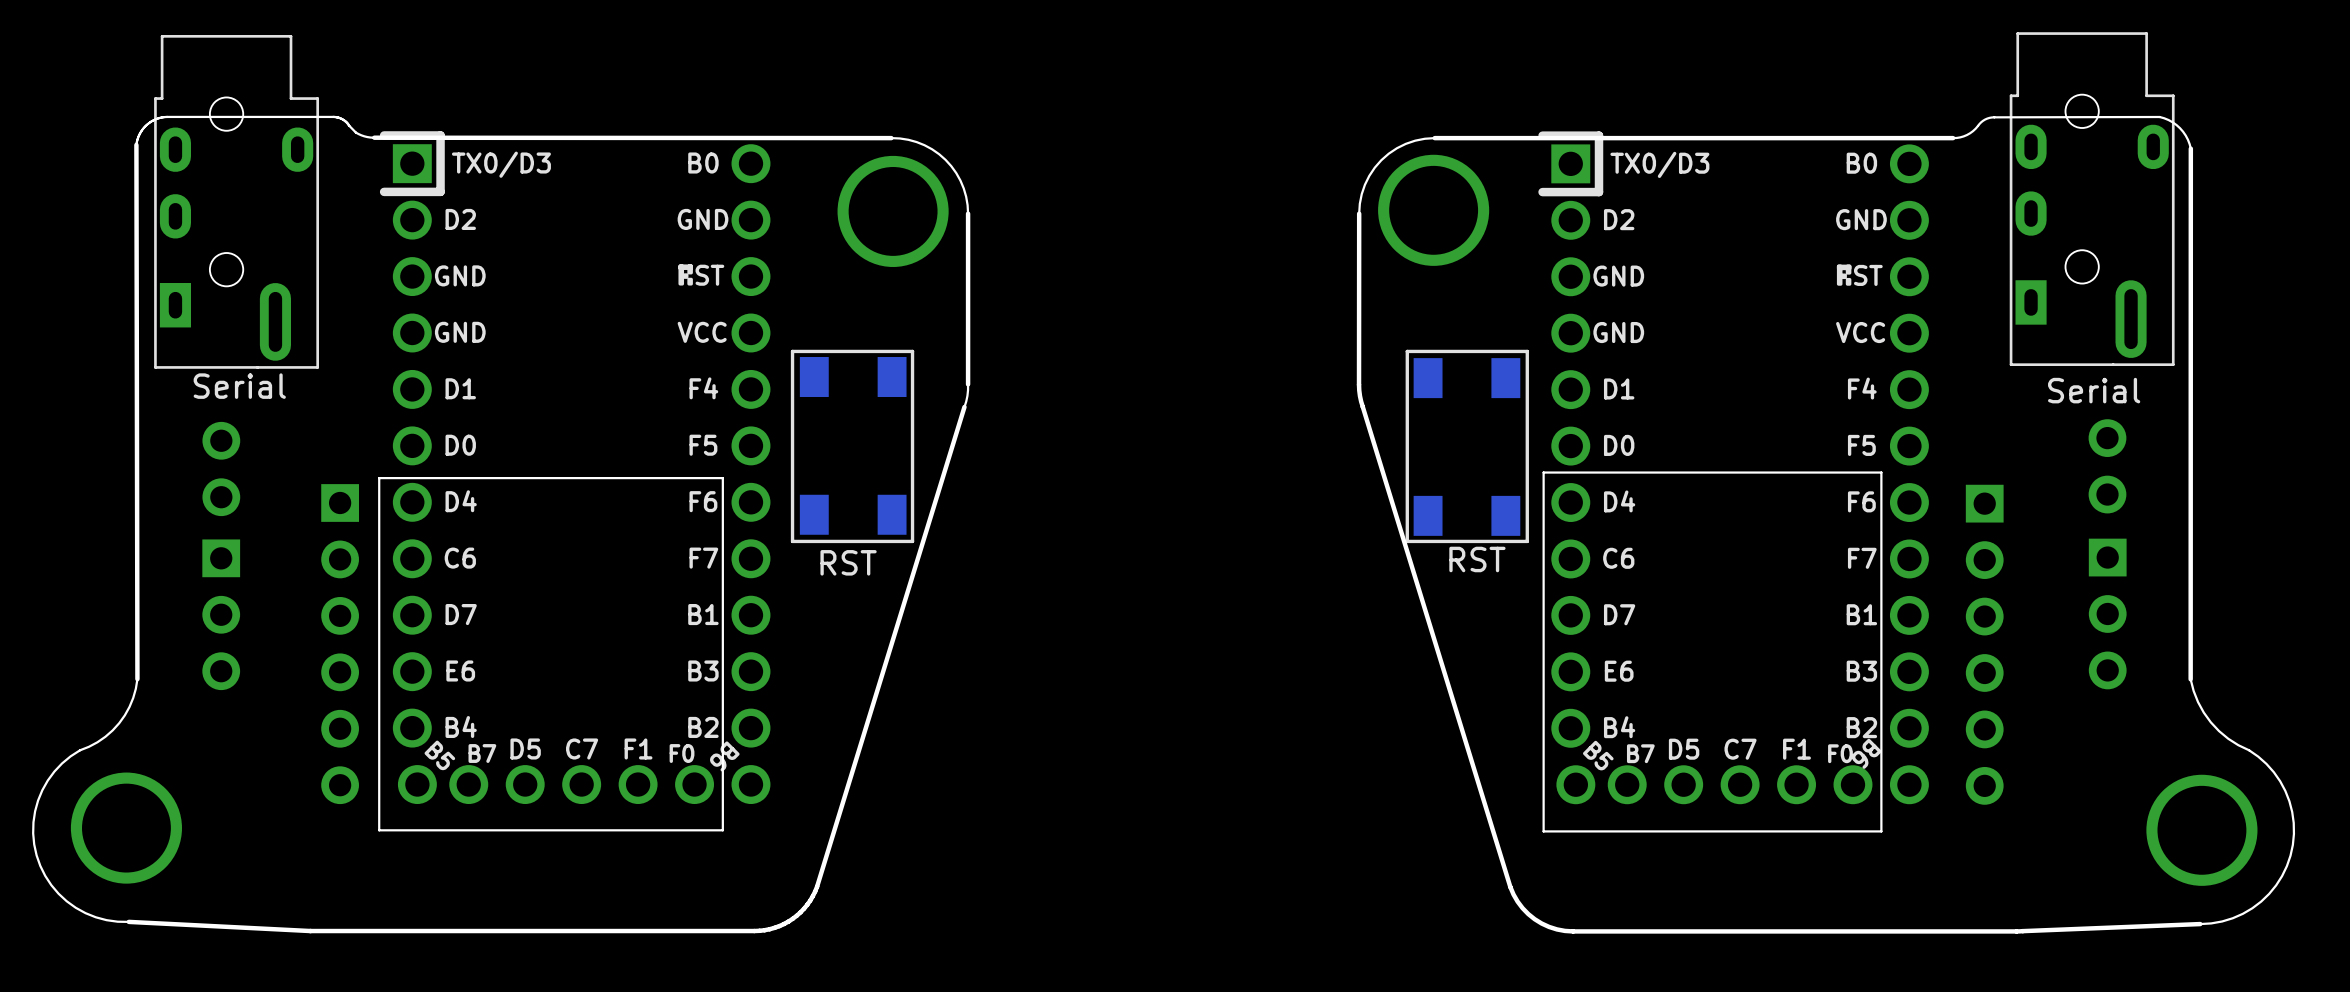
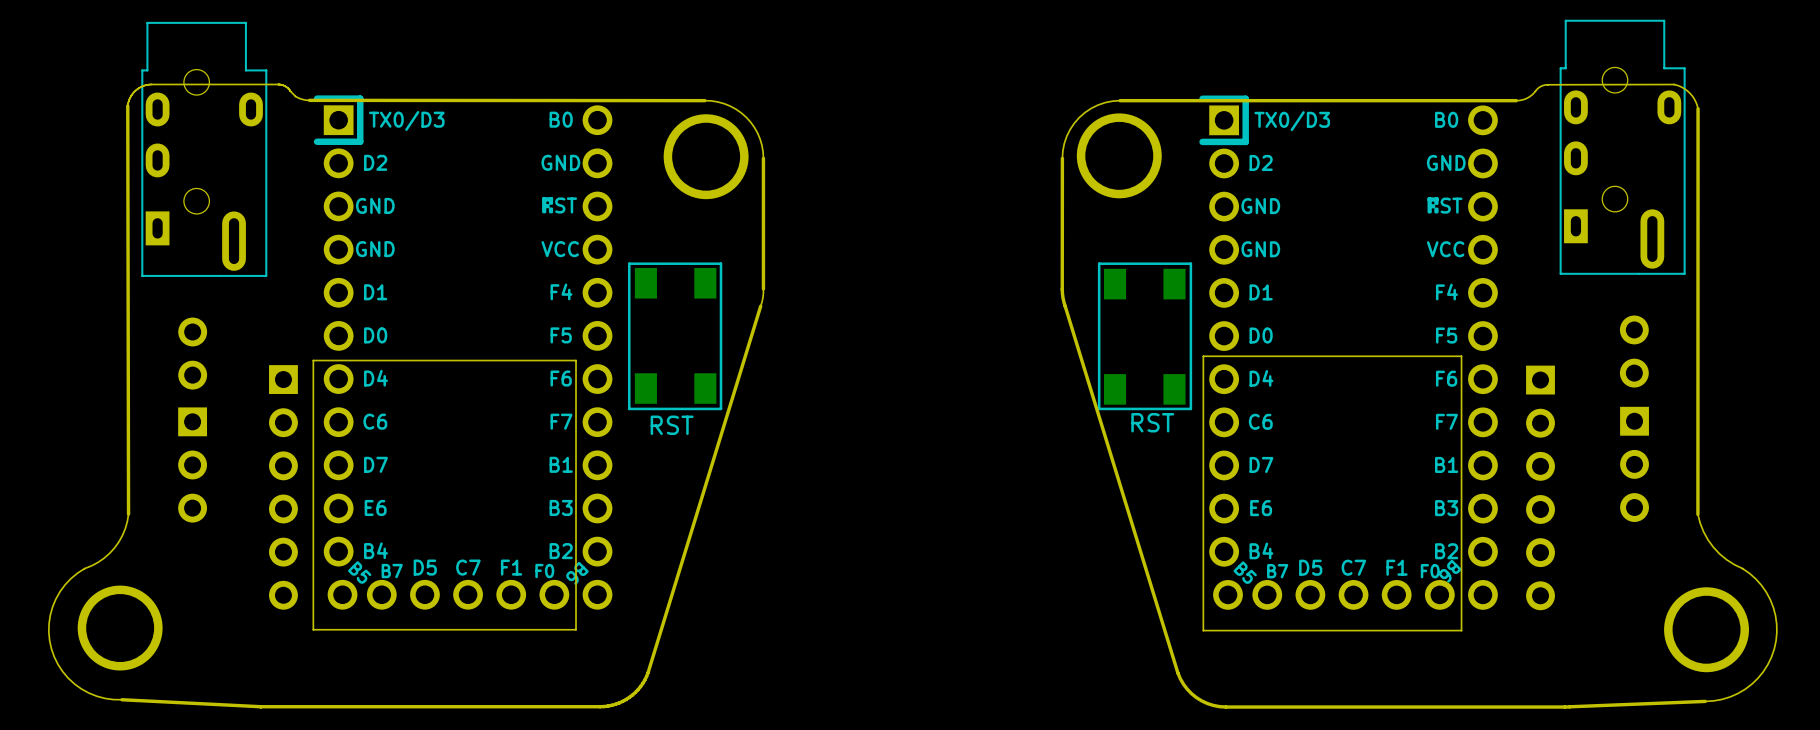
text: Serial (239, 386) -> none
text: Serial (2094, 390) -> none

